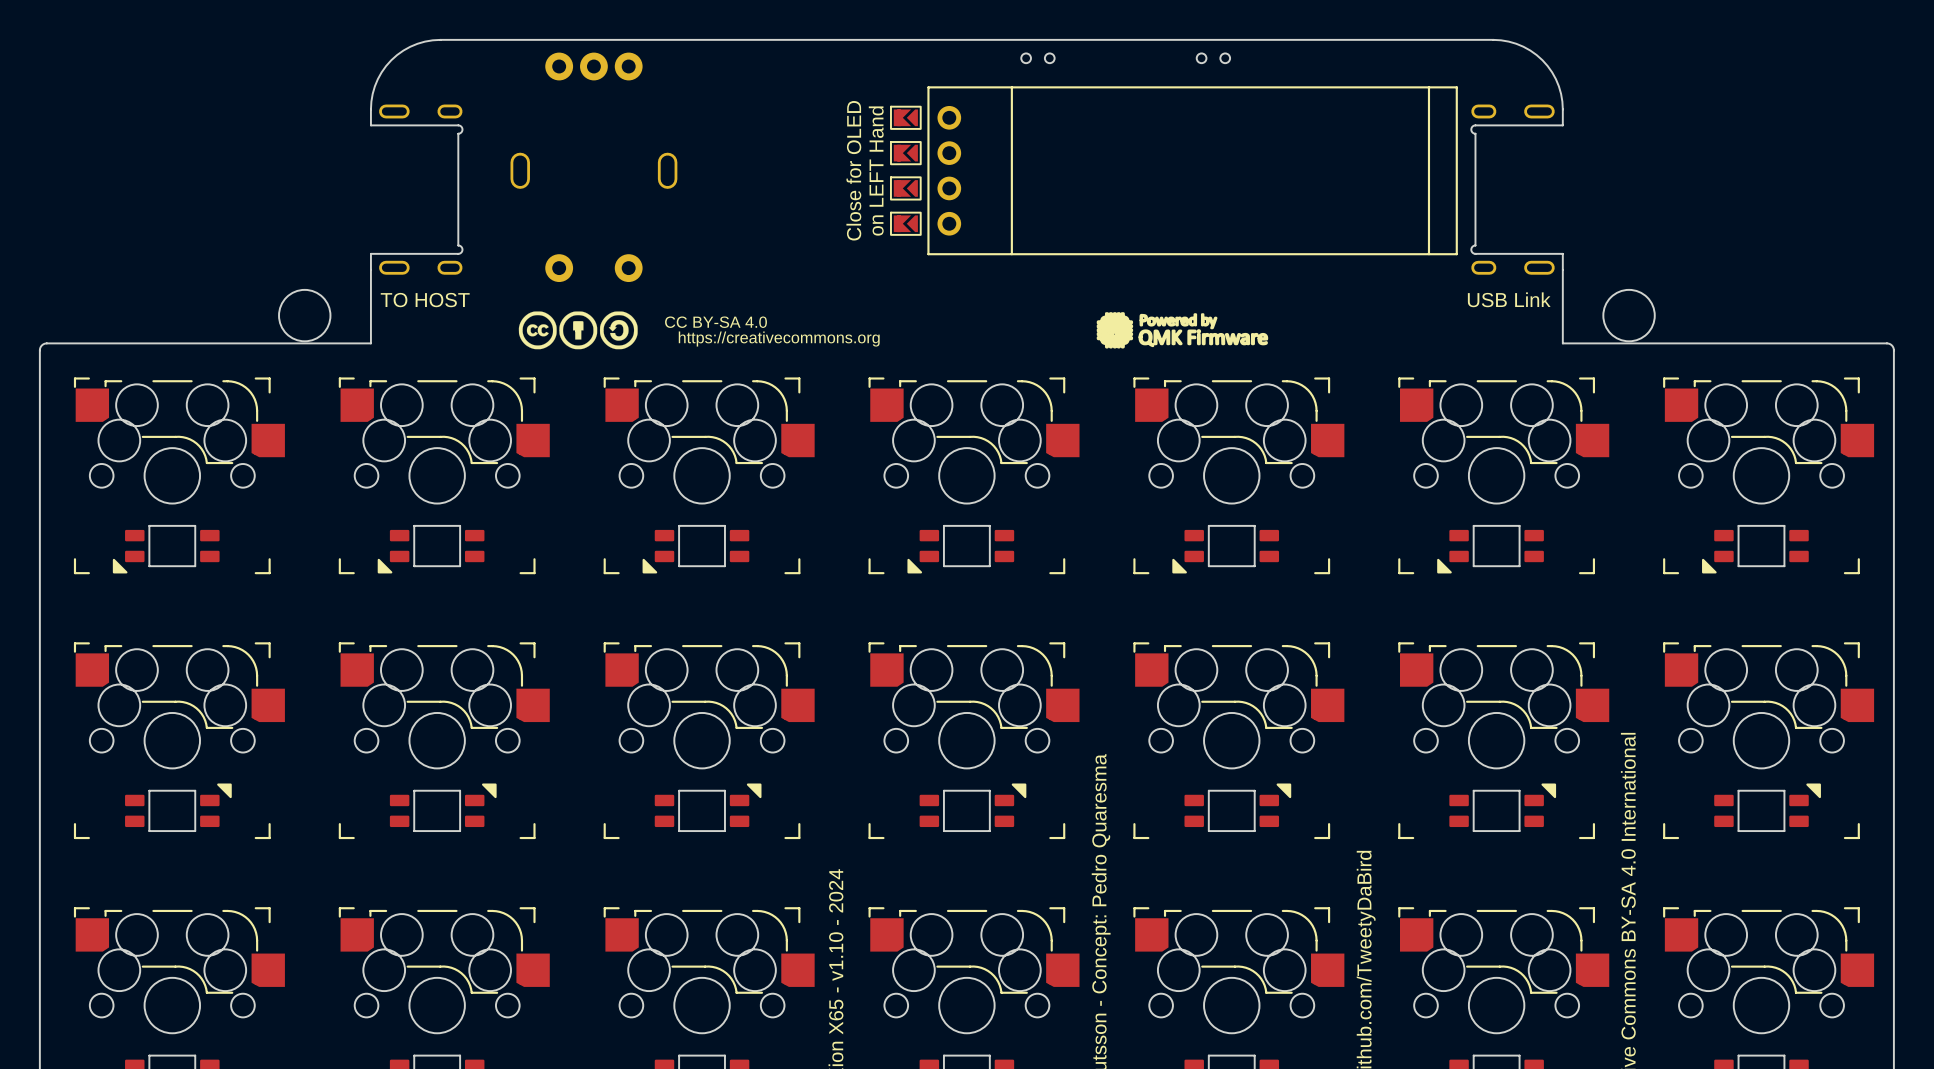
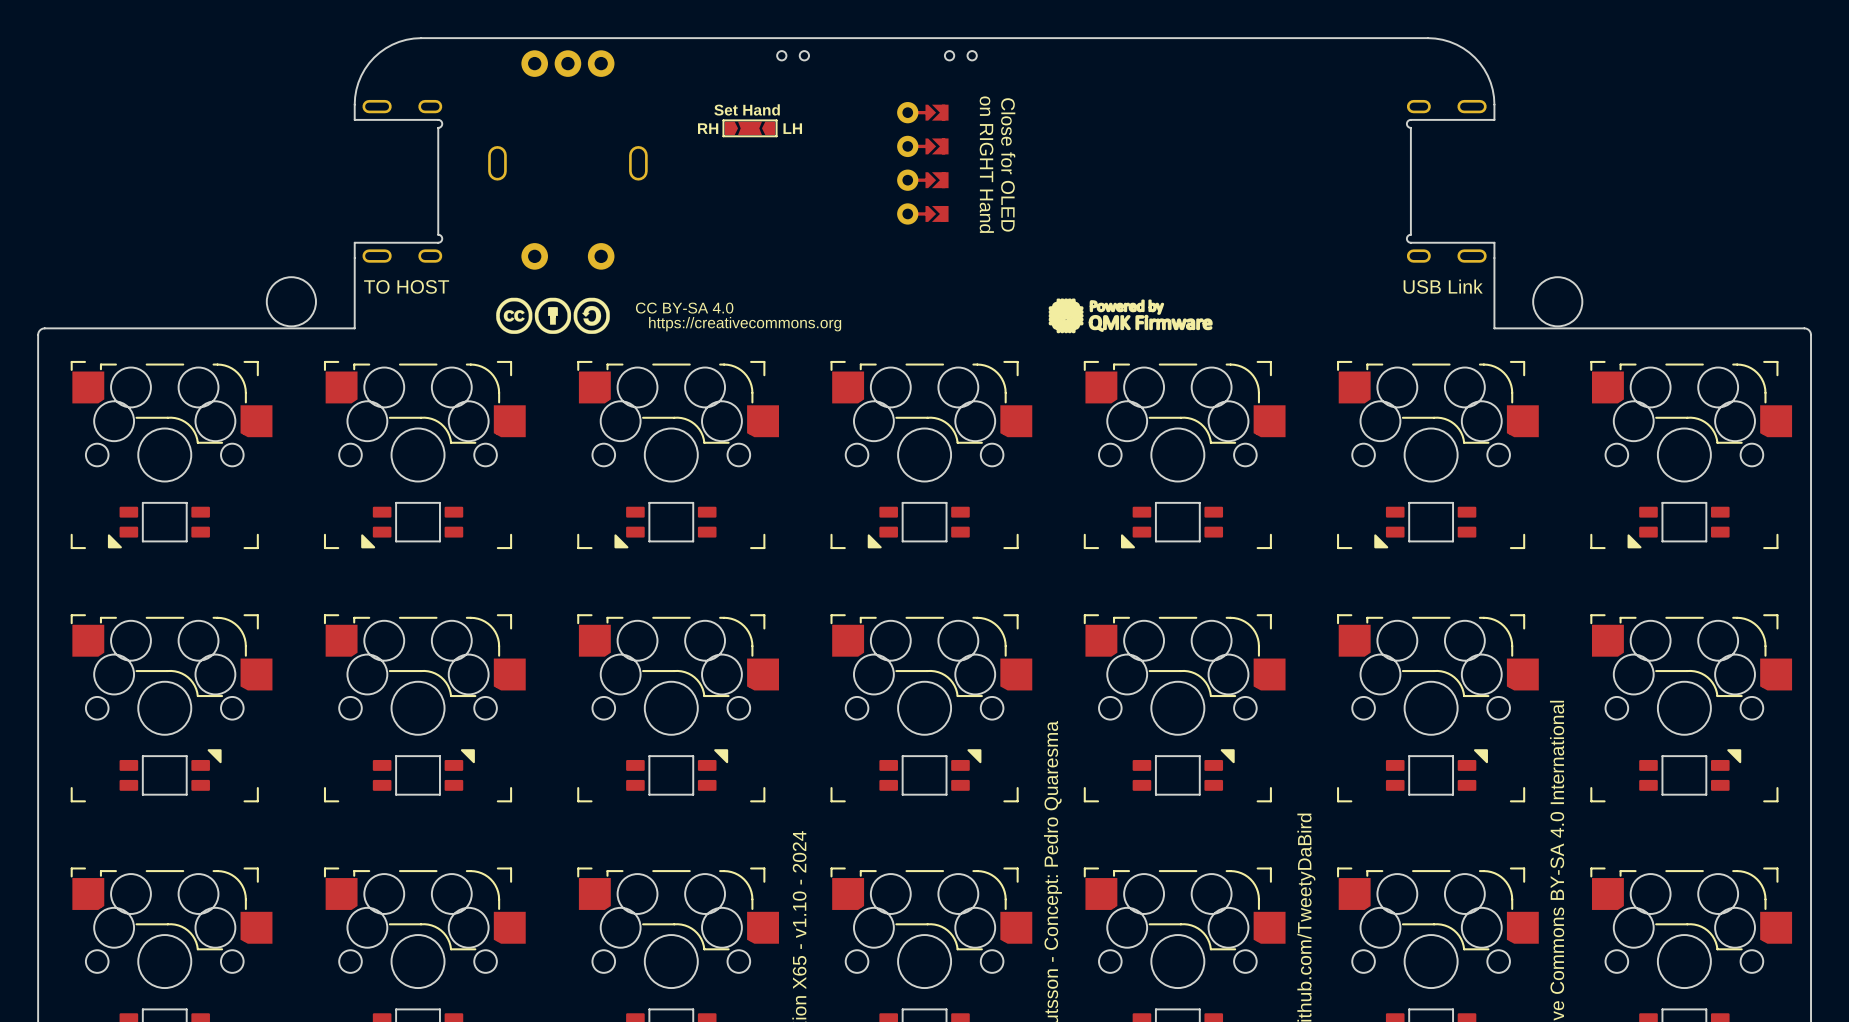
part: none -> (793, 55)
part position: (1037, 58) -> (960, 55)
part: (1213, 58) -> none
text: none -> Set Hand (747, 109)
part: (905, 117) -> none
text: none -> RH (708, 128)
part: none -> (750, 128)
text: none -> LH (792, 128)
part: (905, 153) -> none
text rotation: 0° (853, 170) -> 180° (1008, 164)
text position: Close for OLED (853, 170) -> Close for OLED (1008, 164)
part: none -> (922, 163)
part: (1192, 170) -> none
text: on LEFT Hand (876, 171) -> none
text: none -> on RIGHT Hand (986, 164)
part: (905, 188) -> none
part: (905, 223) -> none

